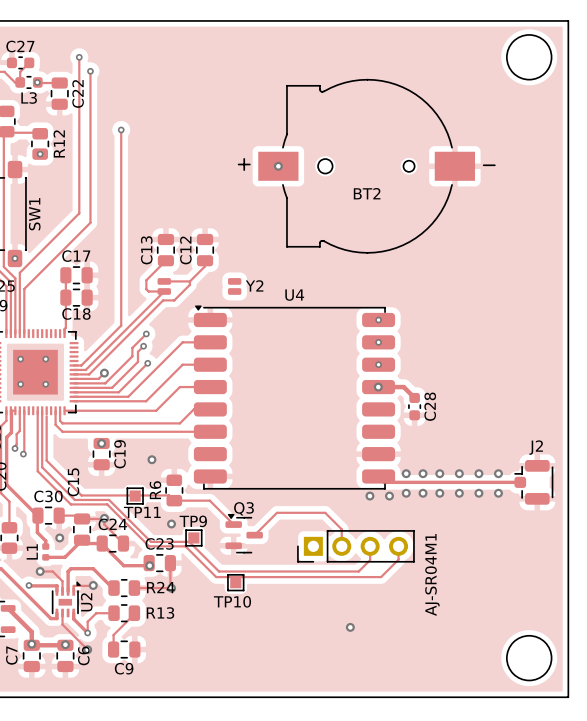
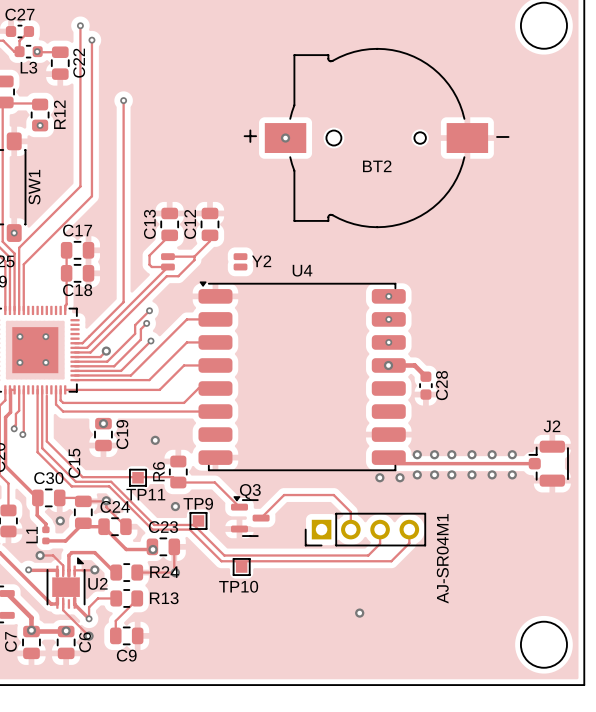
U2 footprint: [51, 581, 81, 618] -> [46, 557, 86, 609]
U2 name rotation: 0° (86, 602) -> 90° clockwise (97, 583)

